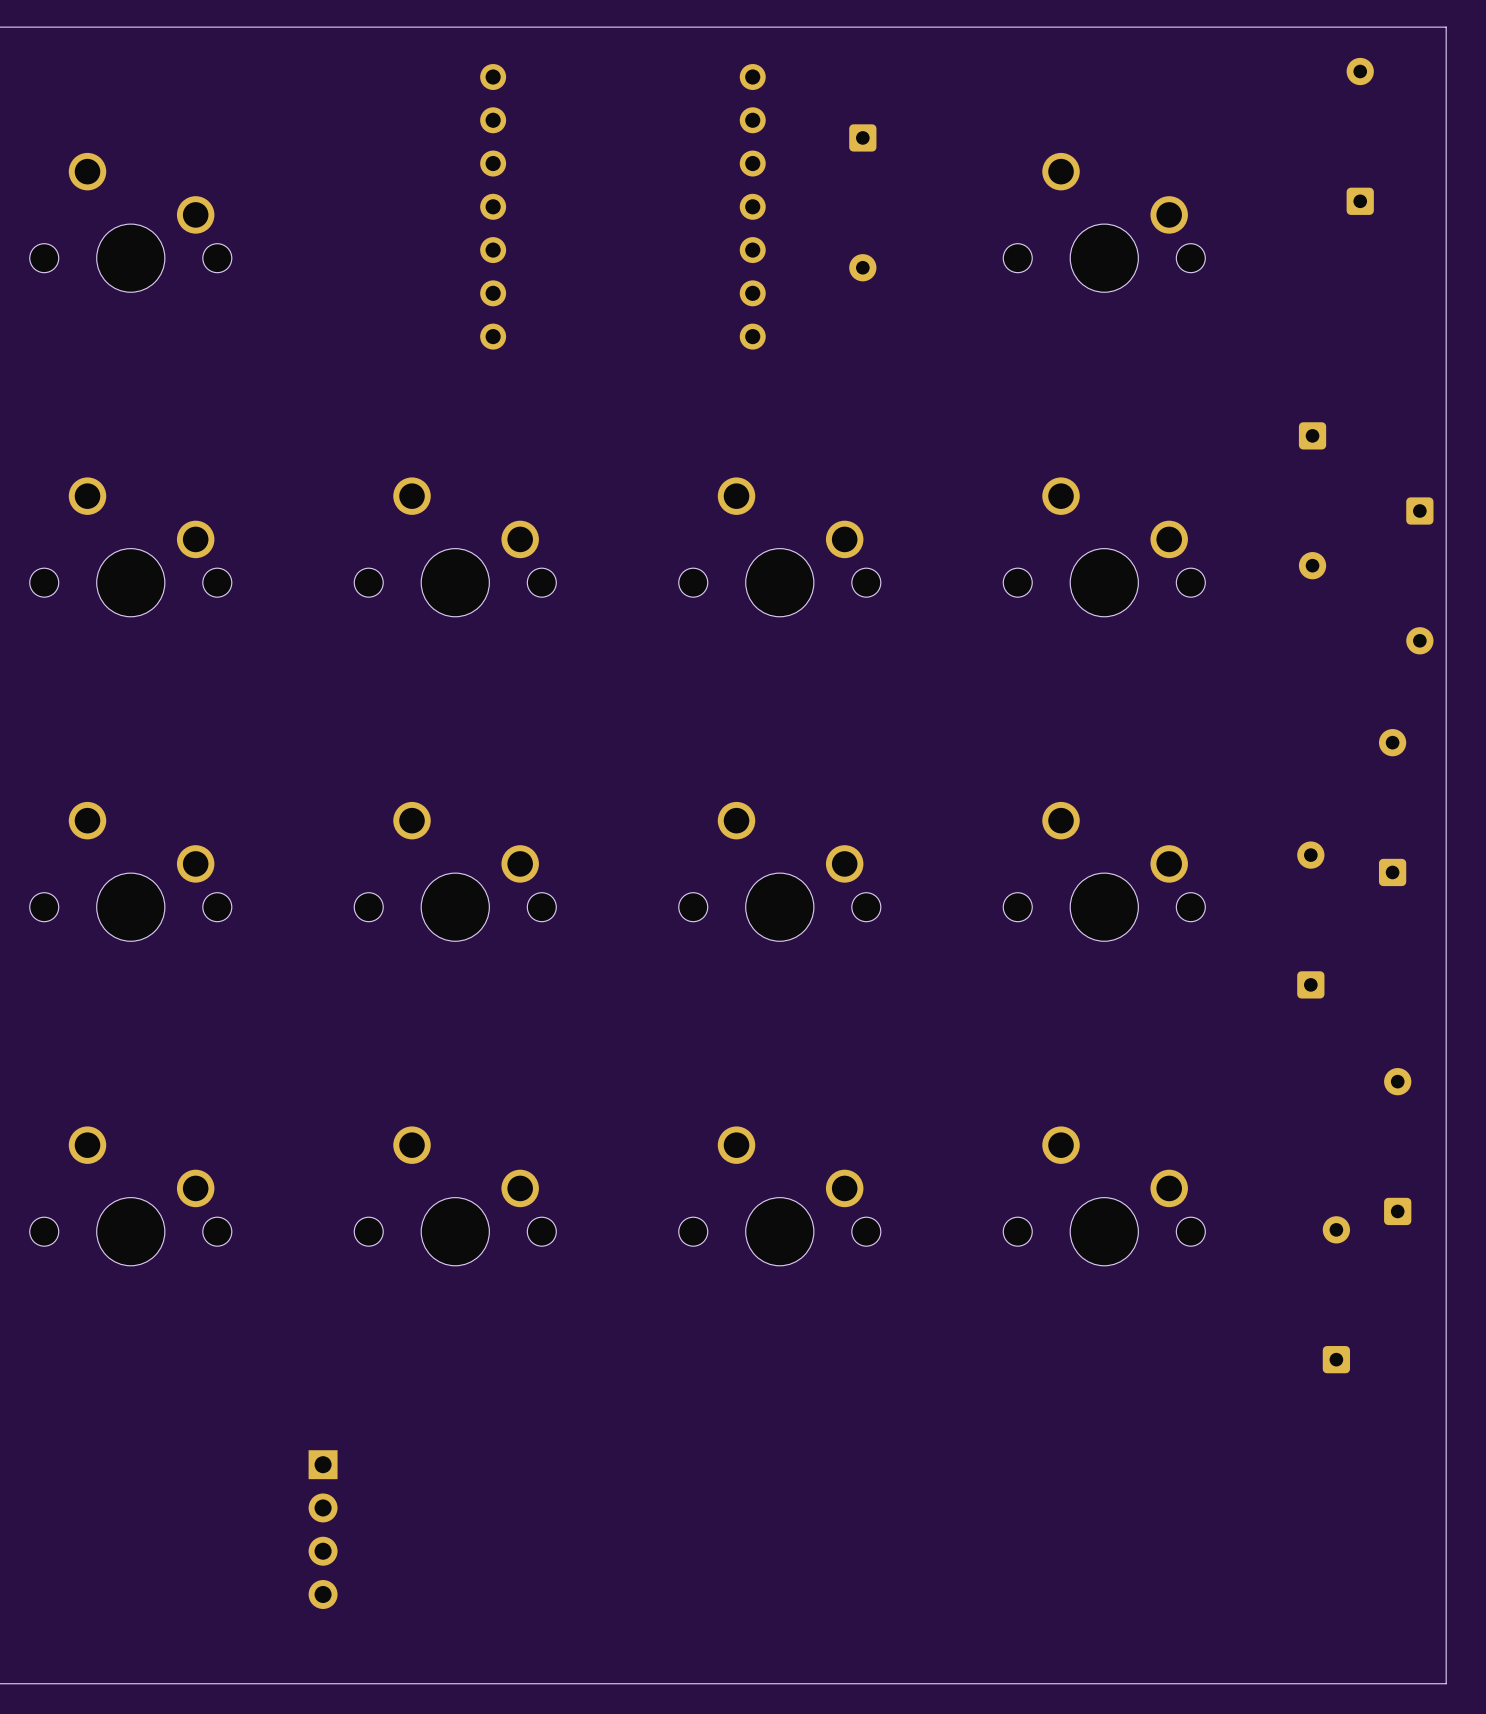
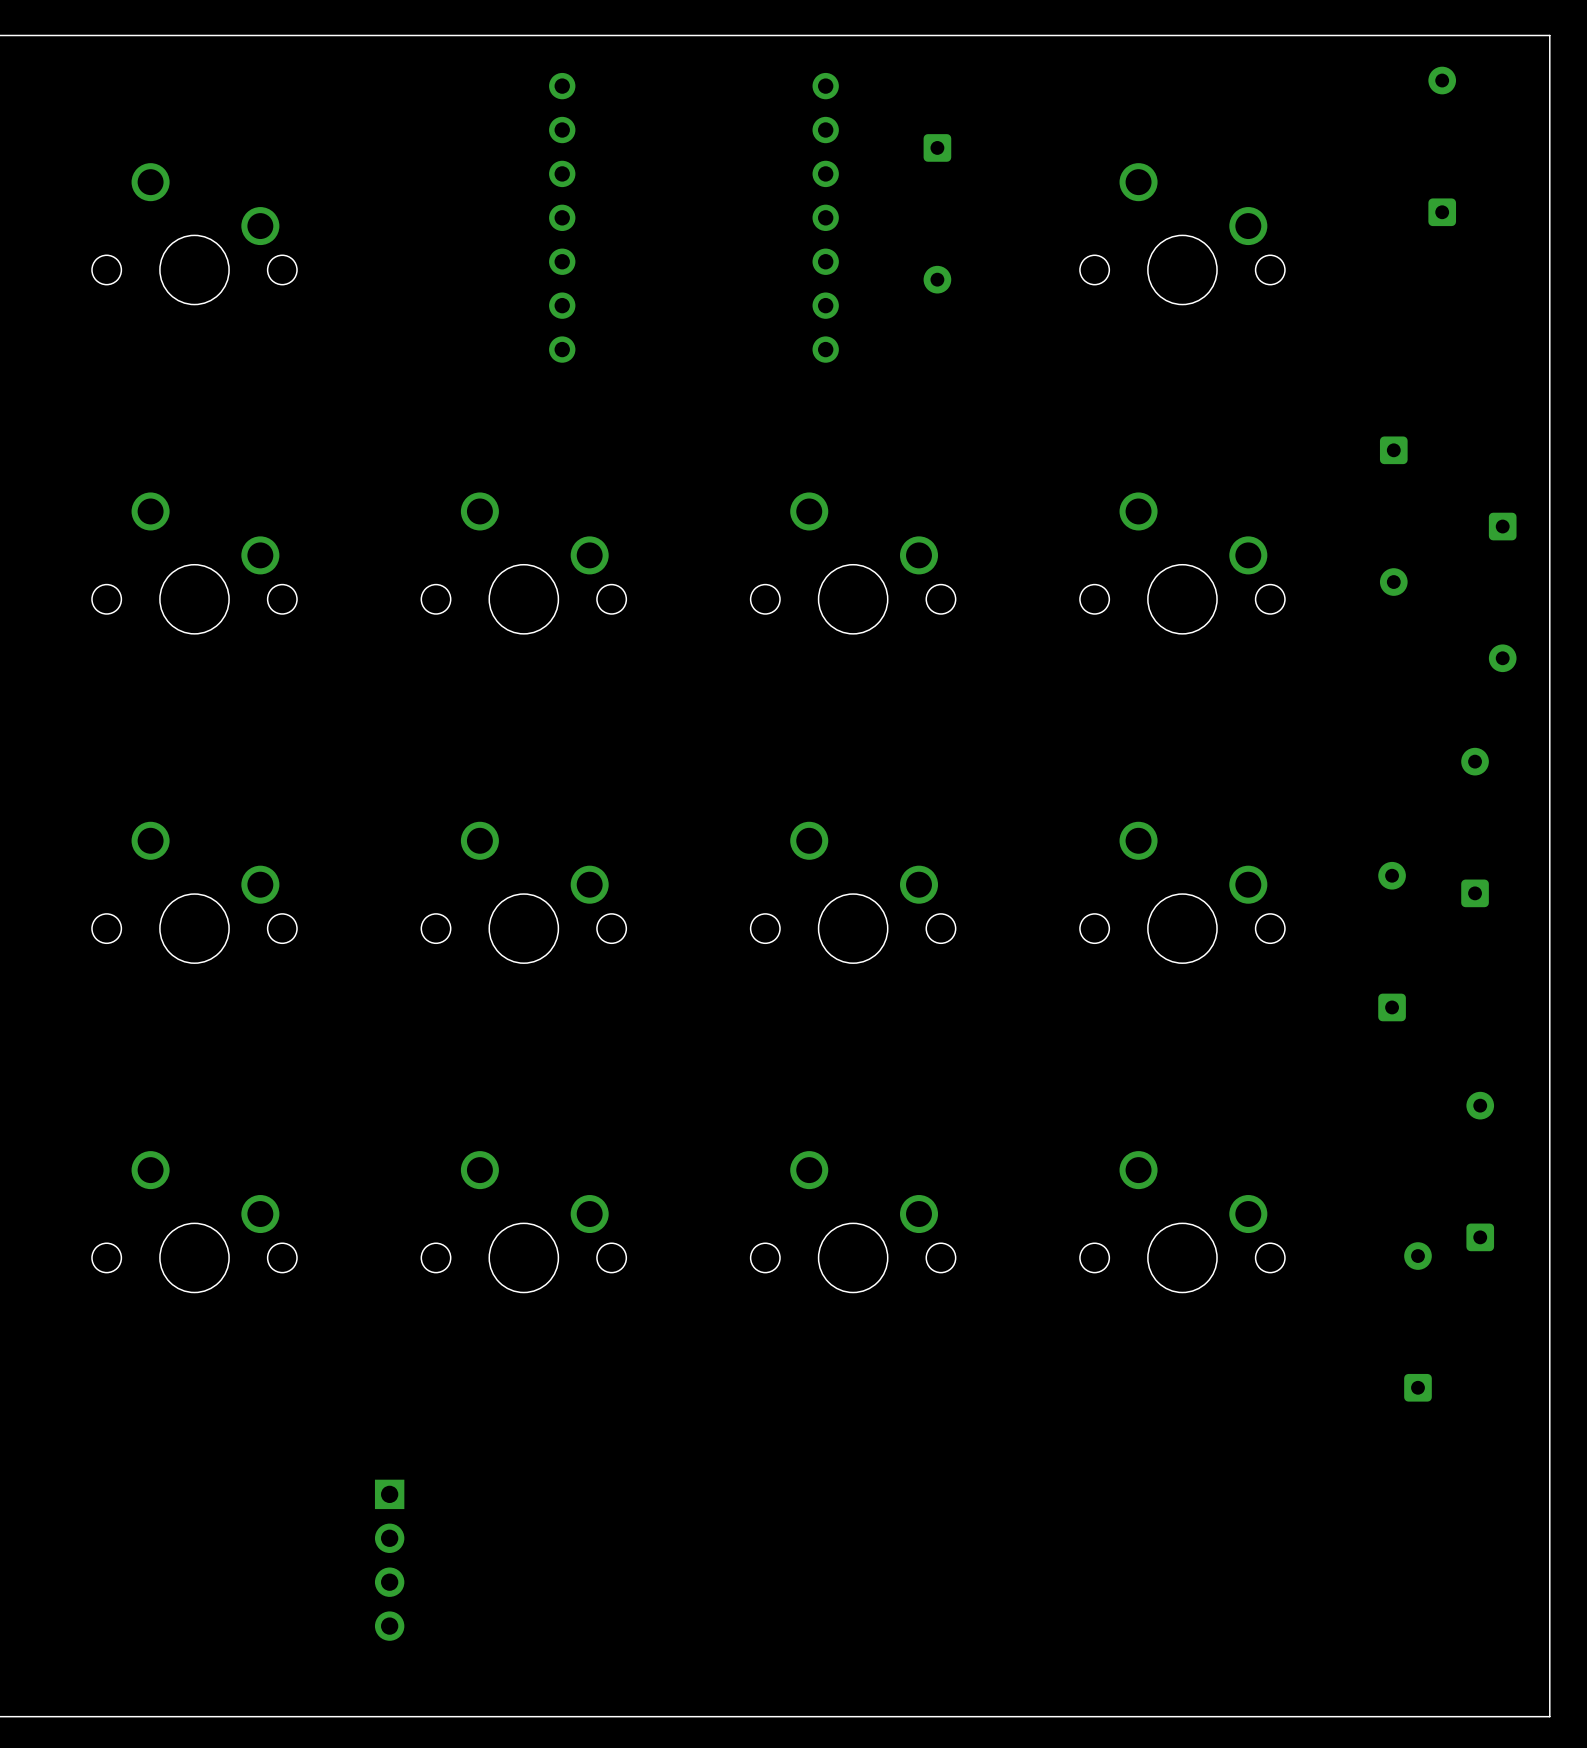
board edge: (1446, 27) (1446, 1683) -> (1529, 35) (1549, 35) (1549, 1716) (1529, 1716)

